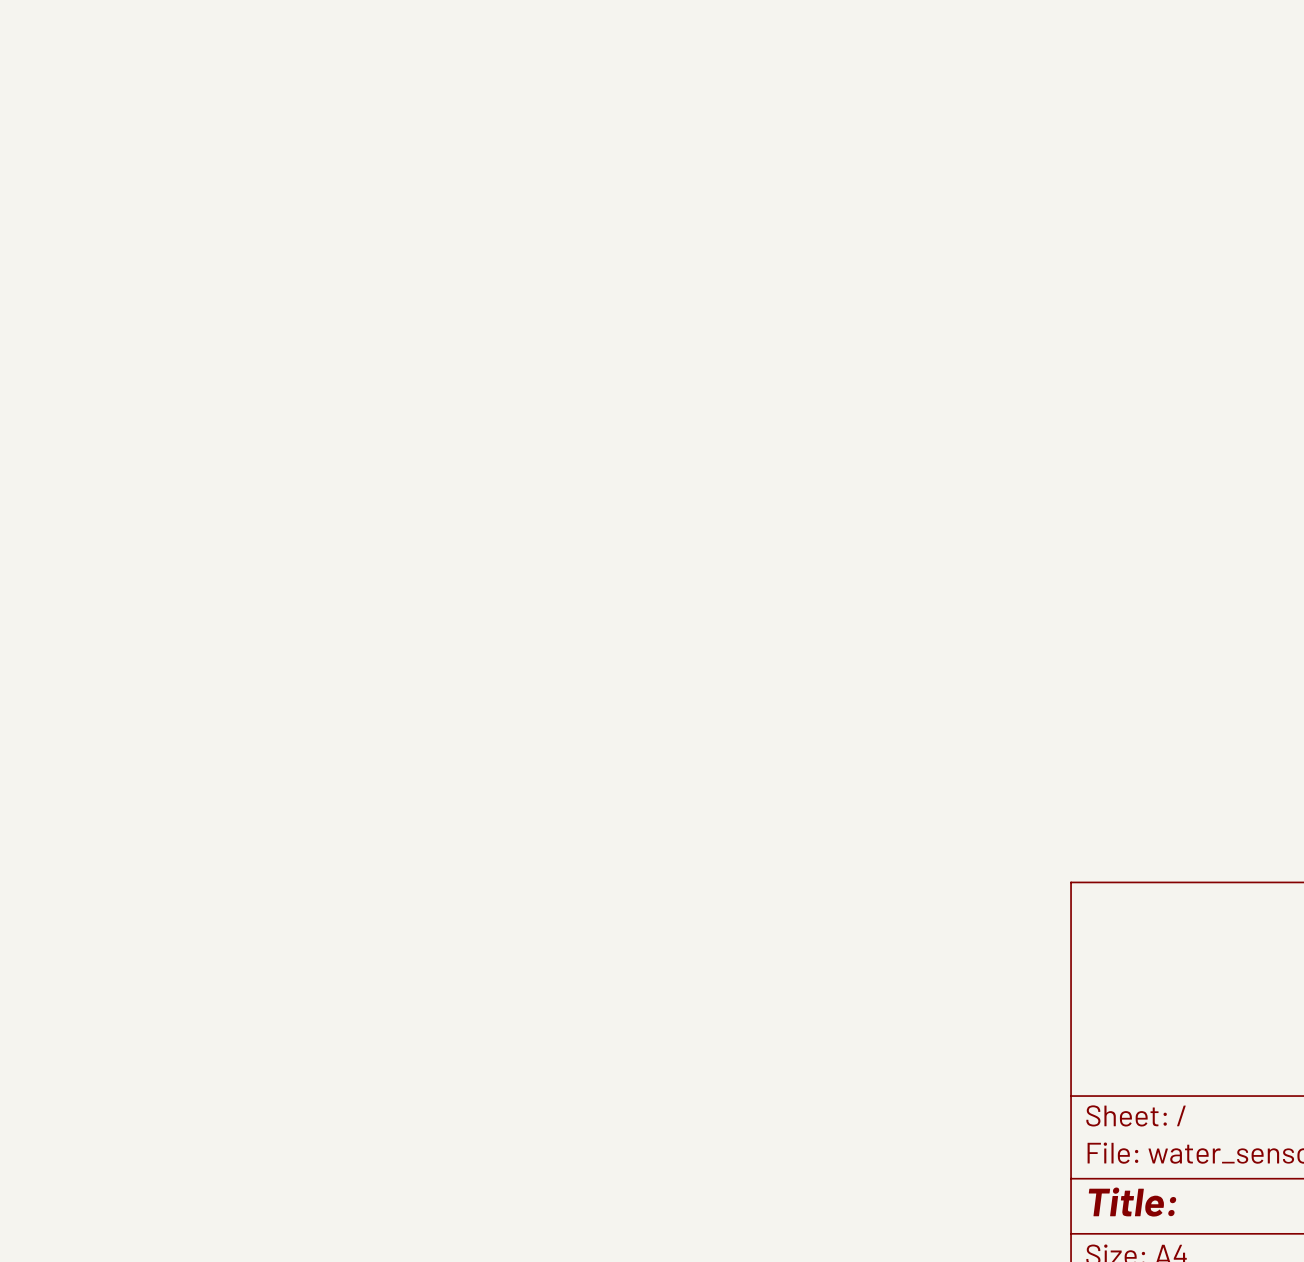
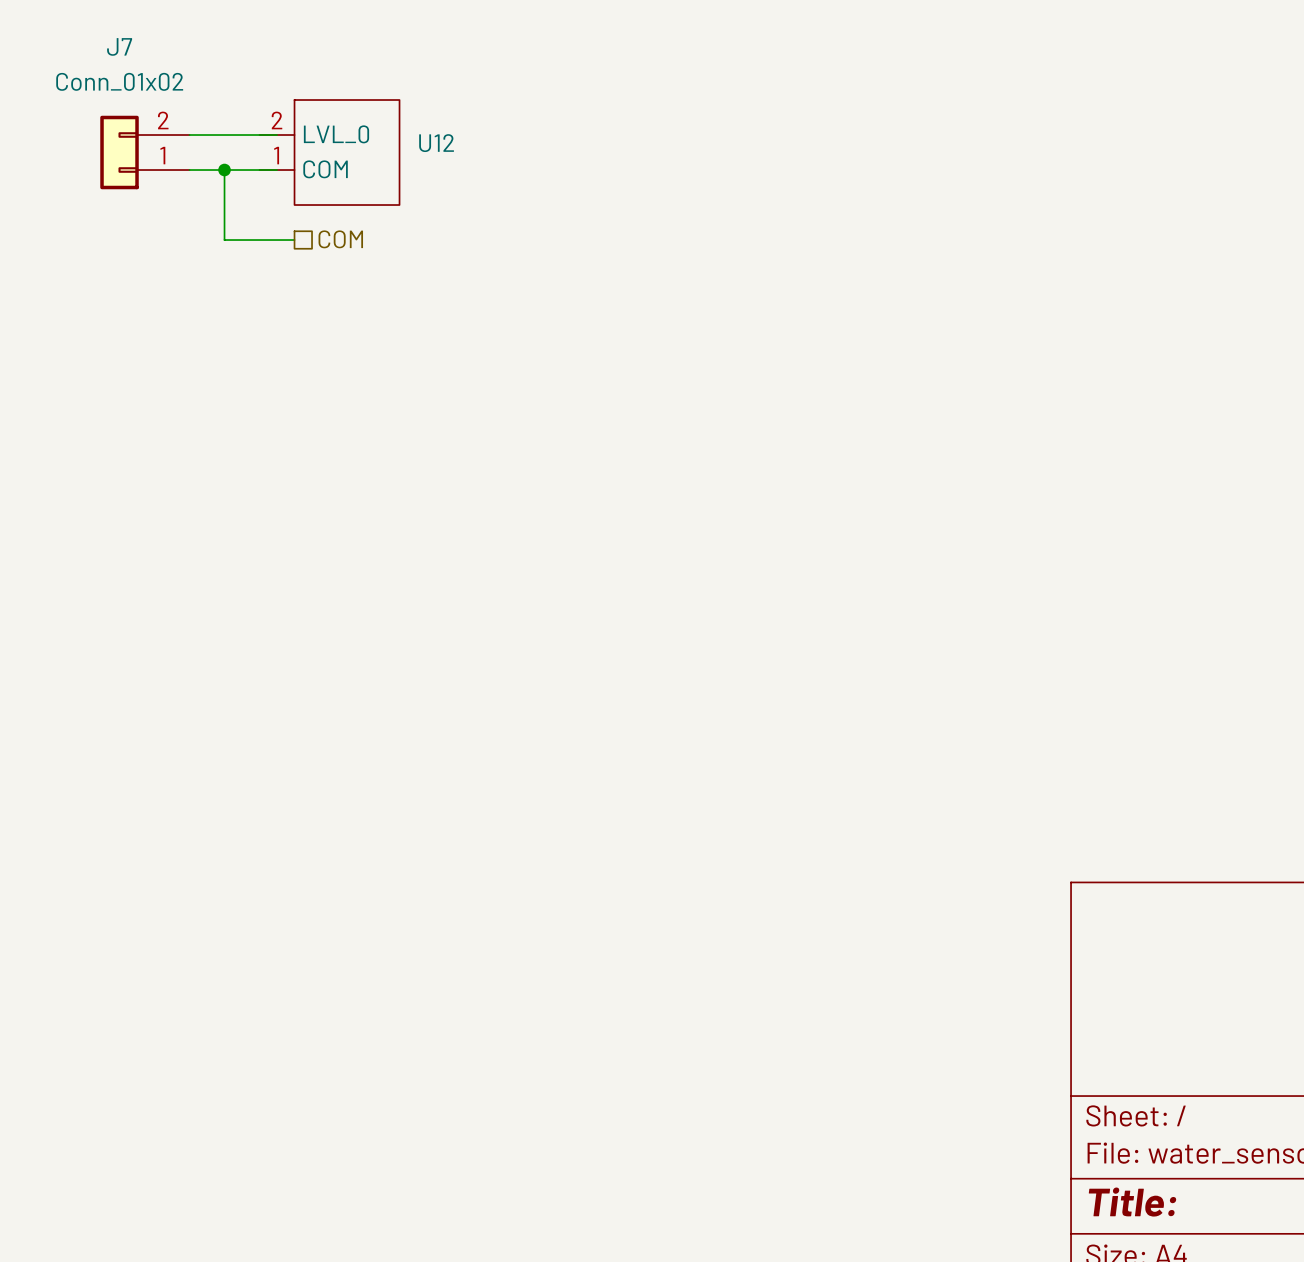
wire: none -> (189, 135) (277, 135)
J7: none -> Conn_01x02 (144, 152)
U12: none -> (329, 152)
wire: none -> (189, 170) (277, 170)
wire: none -> (224, 170) (224, 240) (294, 240)
junction: none -> (224, 170)
hierarchical label: none -> COM (340, 239)

